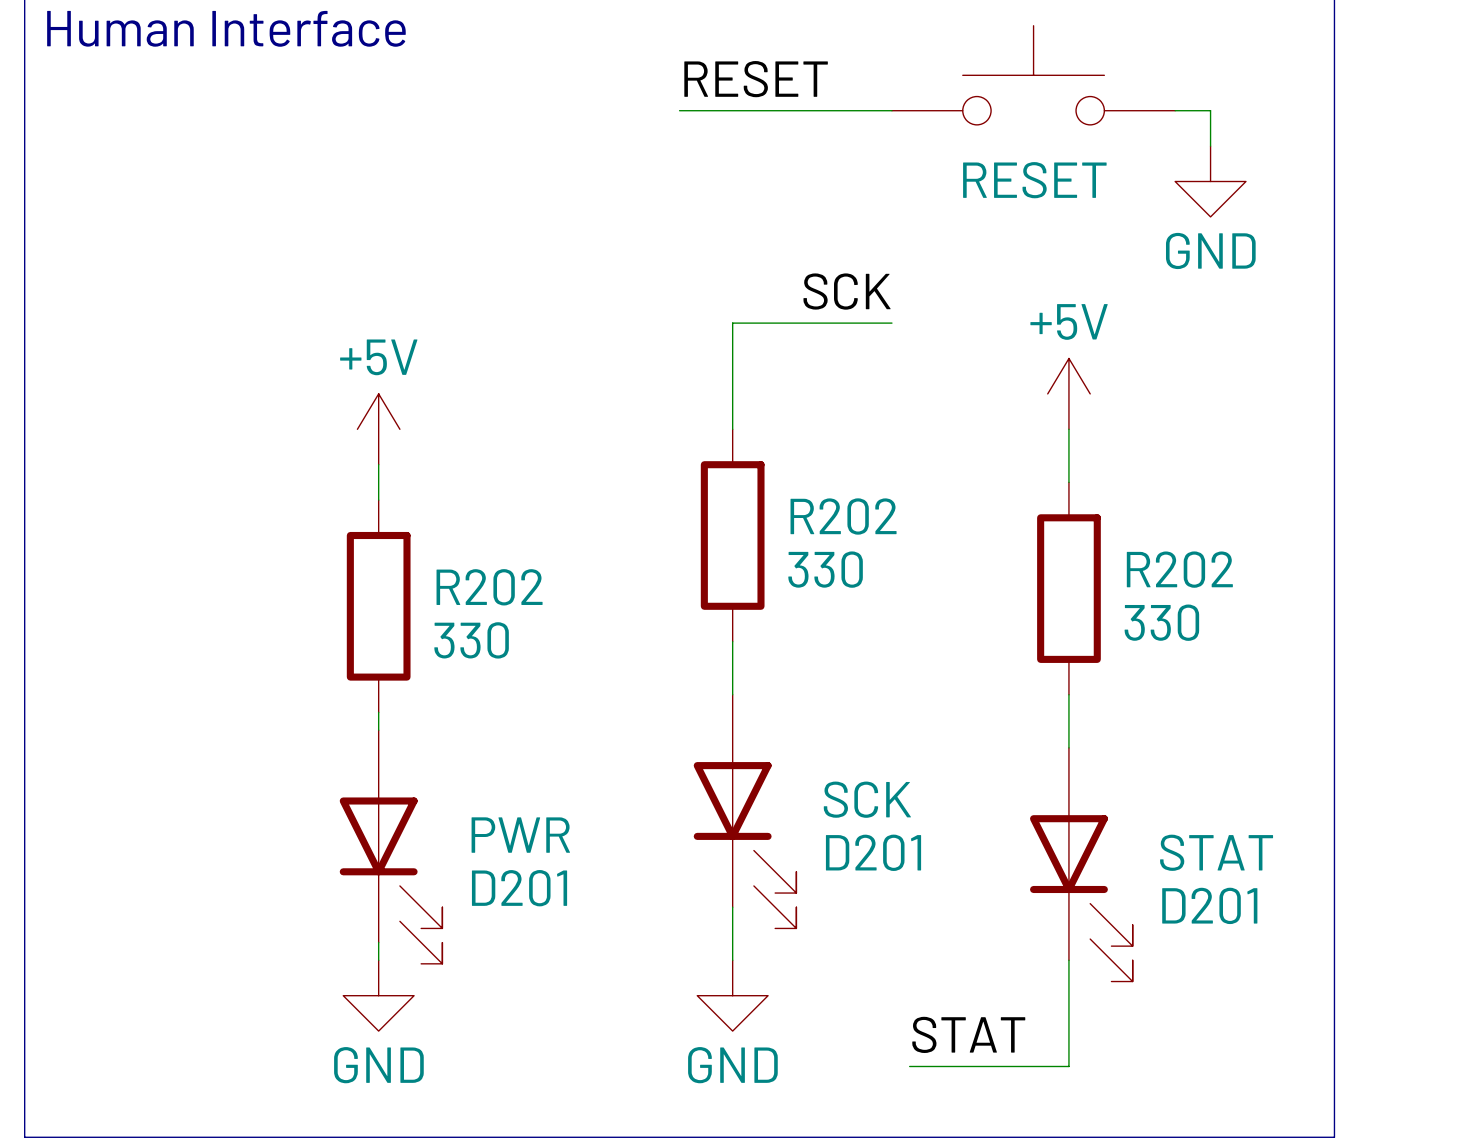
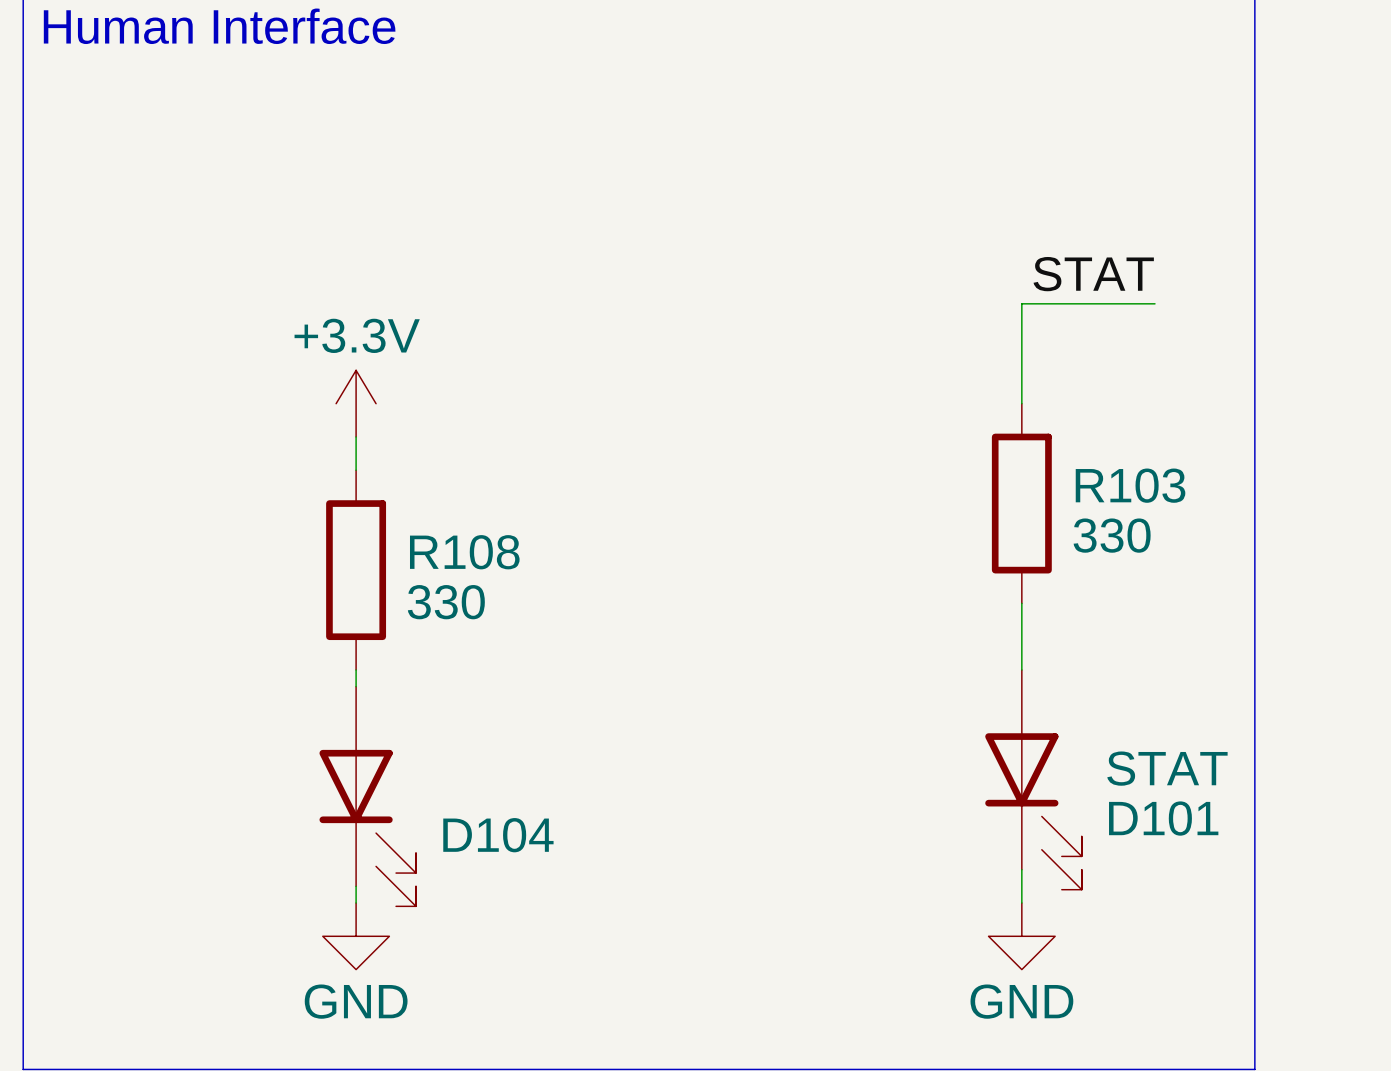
part: RESET (1033, 75) -> none
label: RESET (756, 79) -> none
wire: (679, 110) (891, 110) -> none
wire: (1175, 110) (1210, 110) (1210, 146) -> none
power symbol: GND (1210, 181) -> none
label: SCK (847, 291) -> none
label: none -> STAT (1093, 274)
wire: (891, 323) (732, 323) (732, 429) -> none
wire: none -> (1154, 303) (1021, 303) (1021, 403)
power symbol: +5V (1068, 393) -> none
power symbol: +5V (378, 429) -> +3.3V (356, 403)
wire: (1068, 429) (1068, 482) -> none
R202: 330 (732, 535) -> none
R103: none -> 330 (1021, 503)
R202 name: R202 (489, 587) -> R108 (464, 552)
R202: 330 (1068, 588) -> none
wire: (732, 641) (732, 694) -> none
wire: none -> (1021, 603) (1021, 669)
wire: (1068, 694) (1068, 747) -> none
D201: SCK (745, 811) -> none
D101: none -> STAT (1033, 779)
D201 value: PWR (520, 835) -> none
D201: STAT (1081, 864) -> none
D201 name: D201 (519, 888) -> D104 (498, 835)
wire: (732, 907) (732, 960) -> none
wire: none -> (1021, 869) (1021, 903)
wire: (1068, 960) (1068, 1066) (909, 1066) -> none
power symbol position: GND (732, 995) -> GND (1021, 936)
label: STAT (968, 1034) -> none

